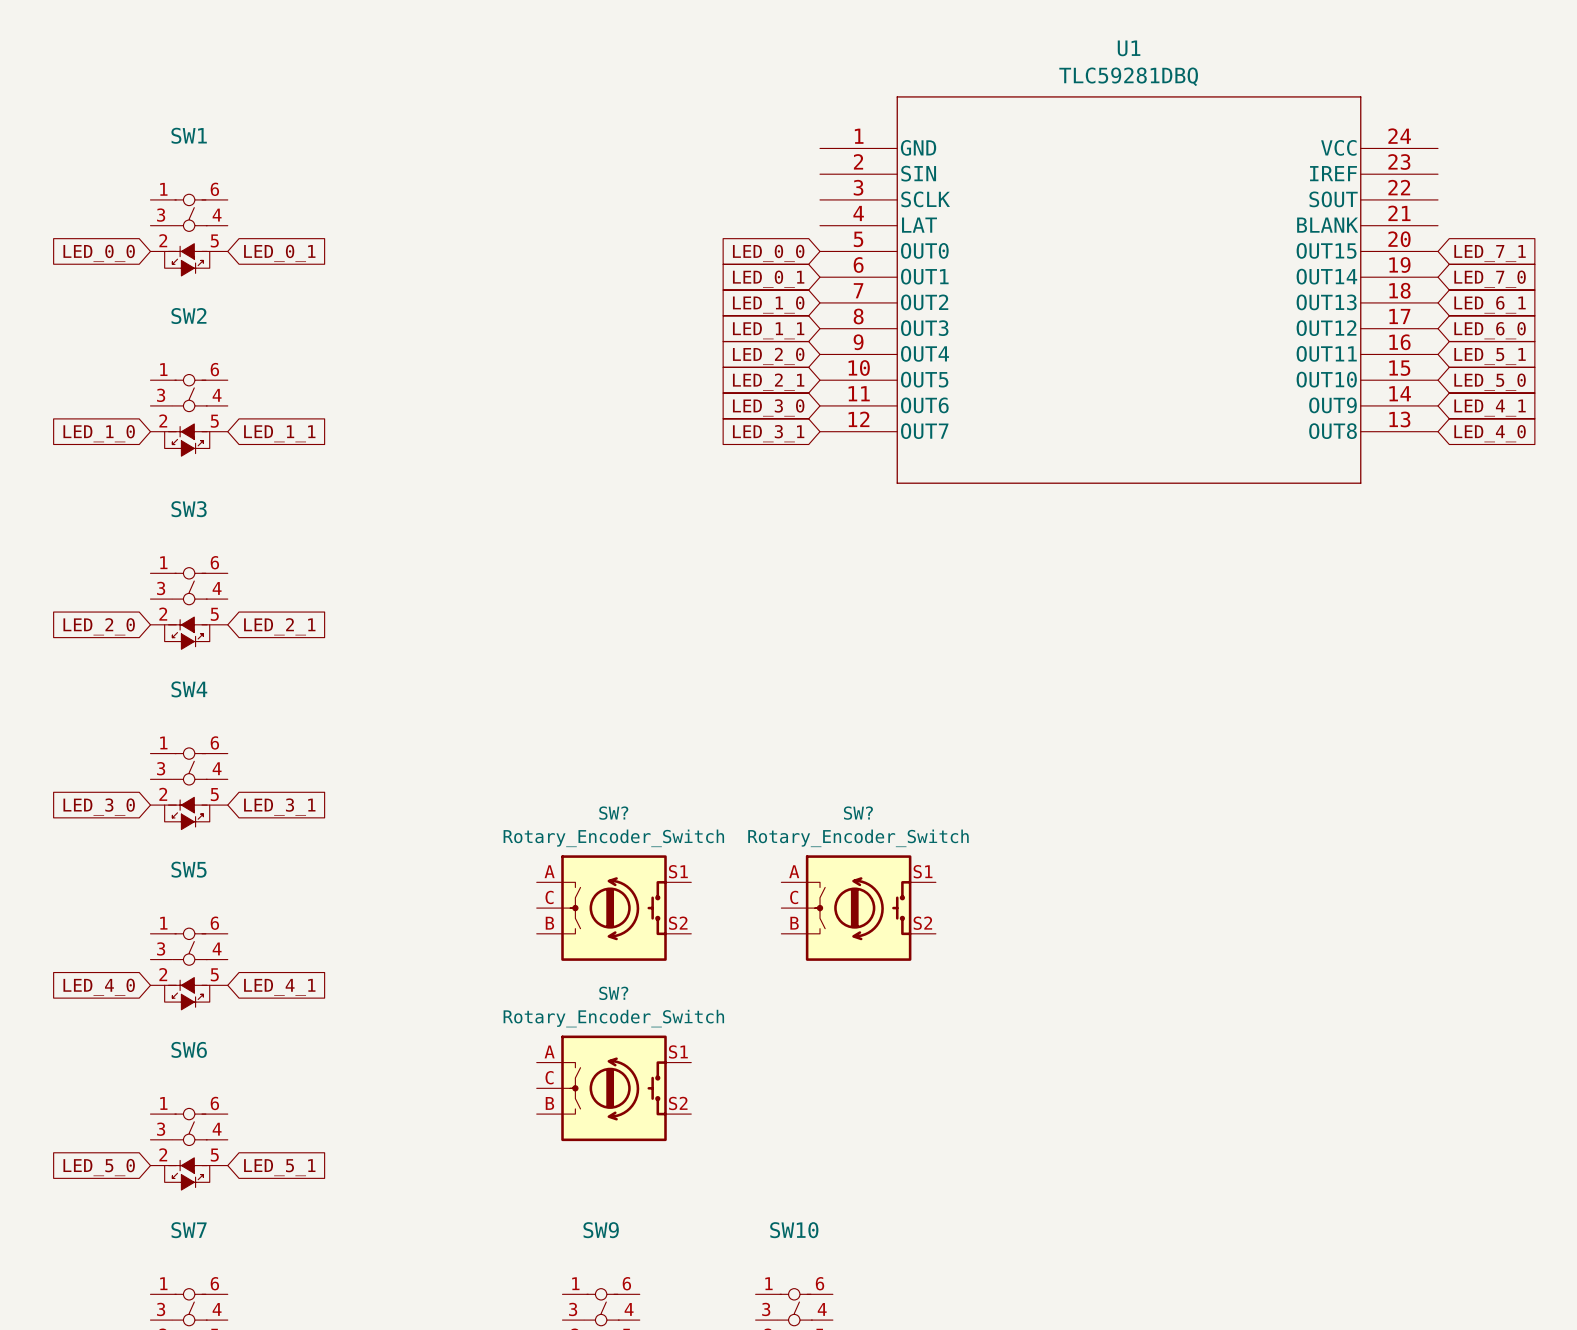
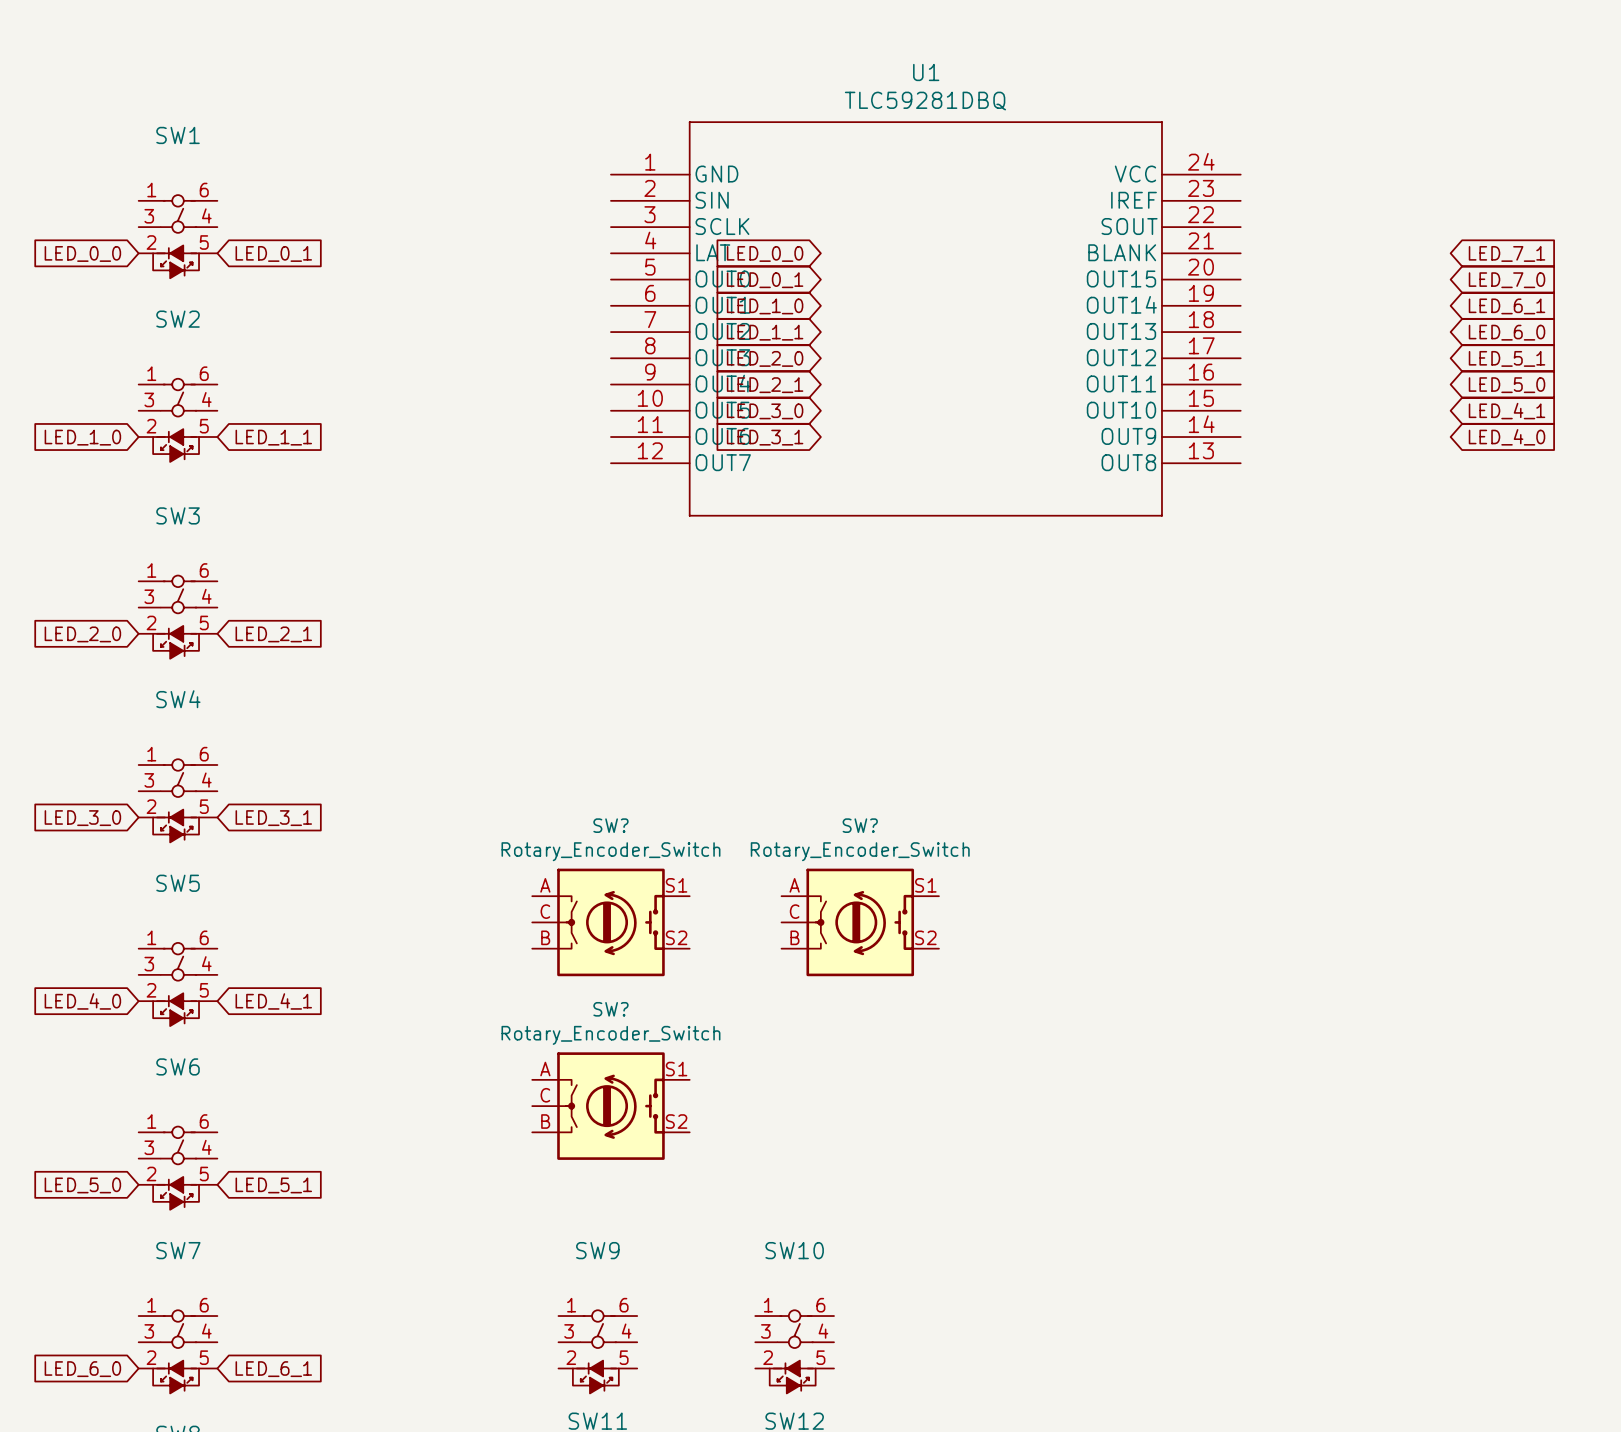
U1 position: (1129, 290) -> (925, 318)

